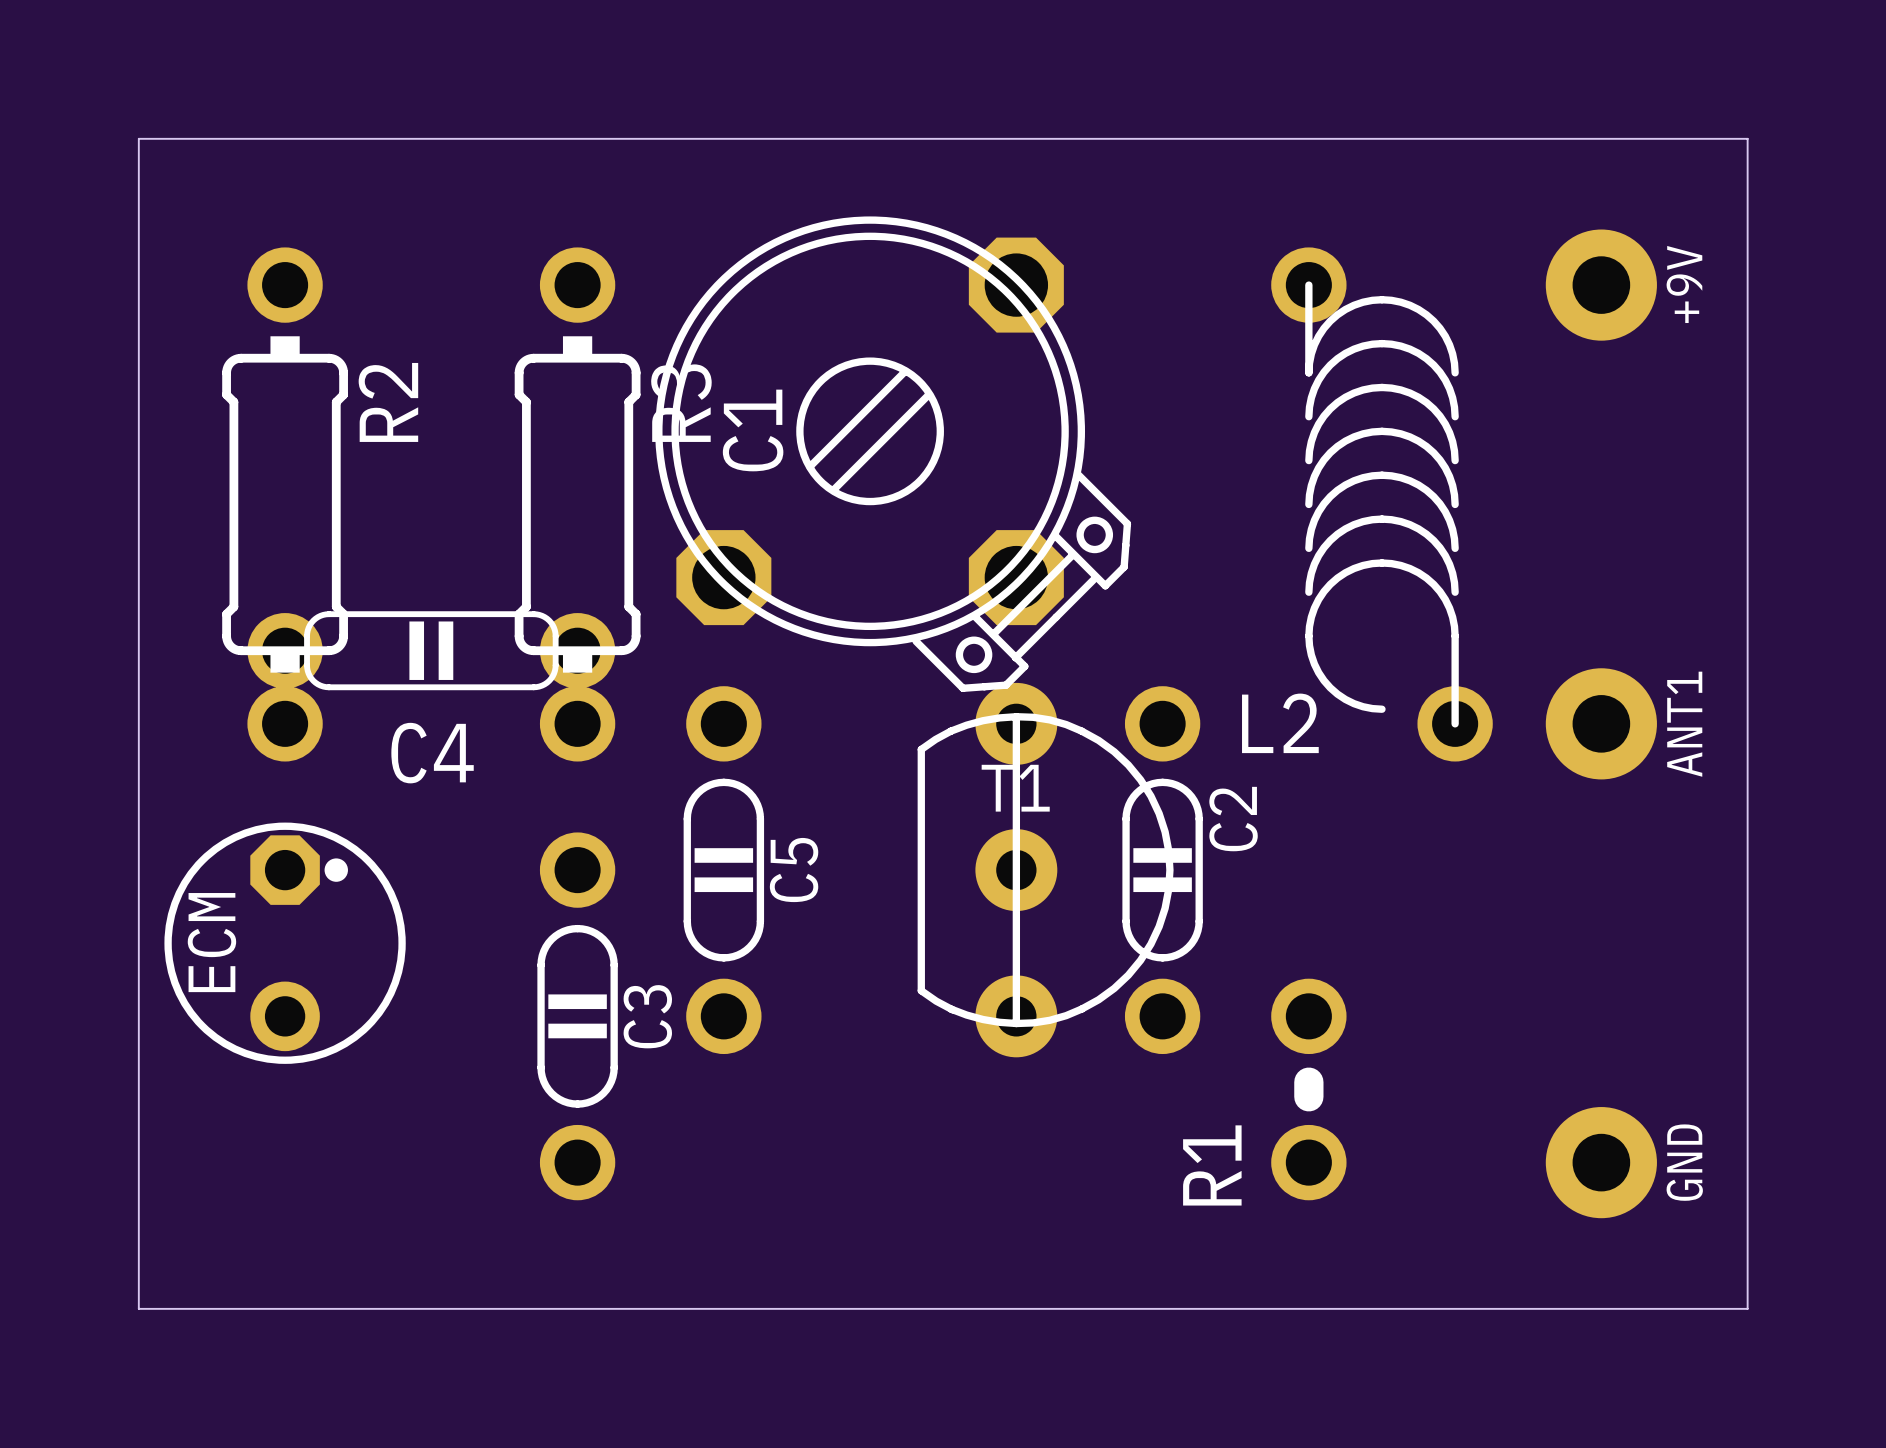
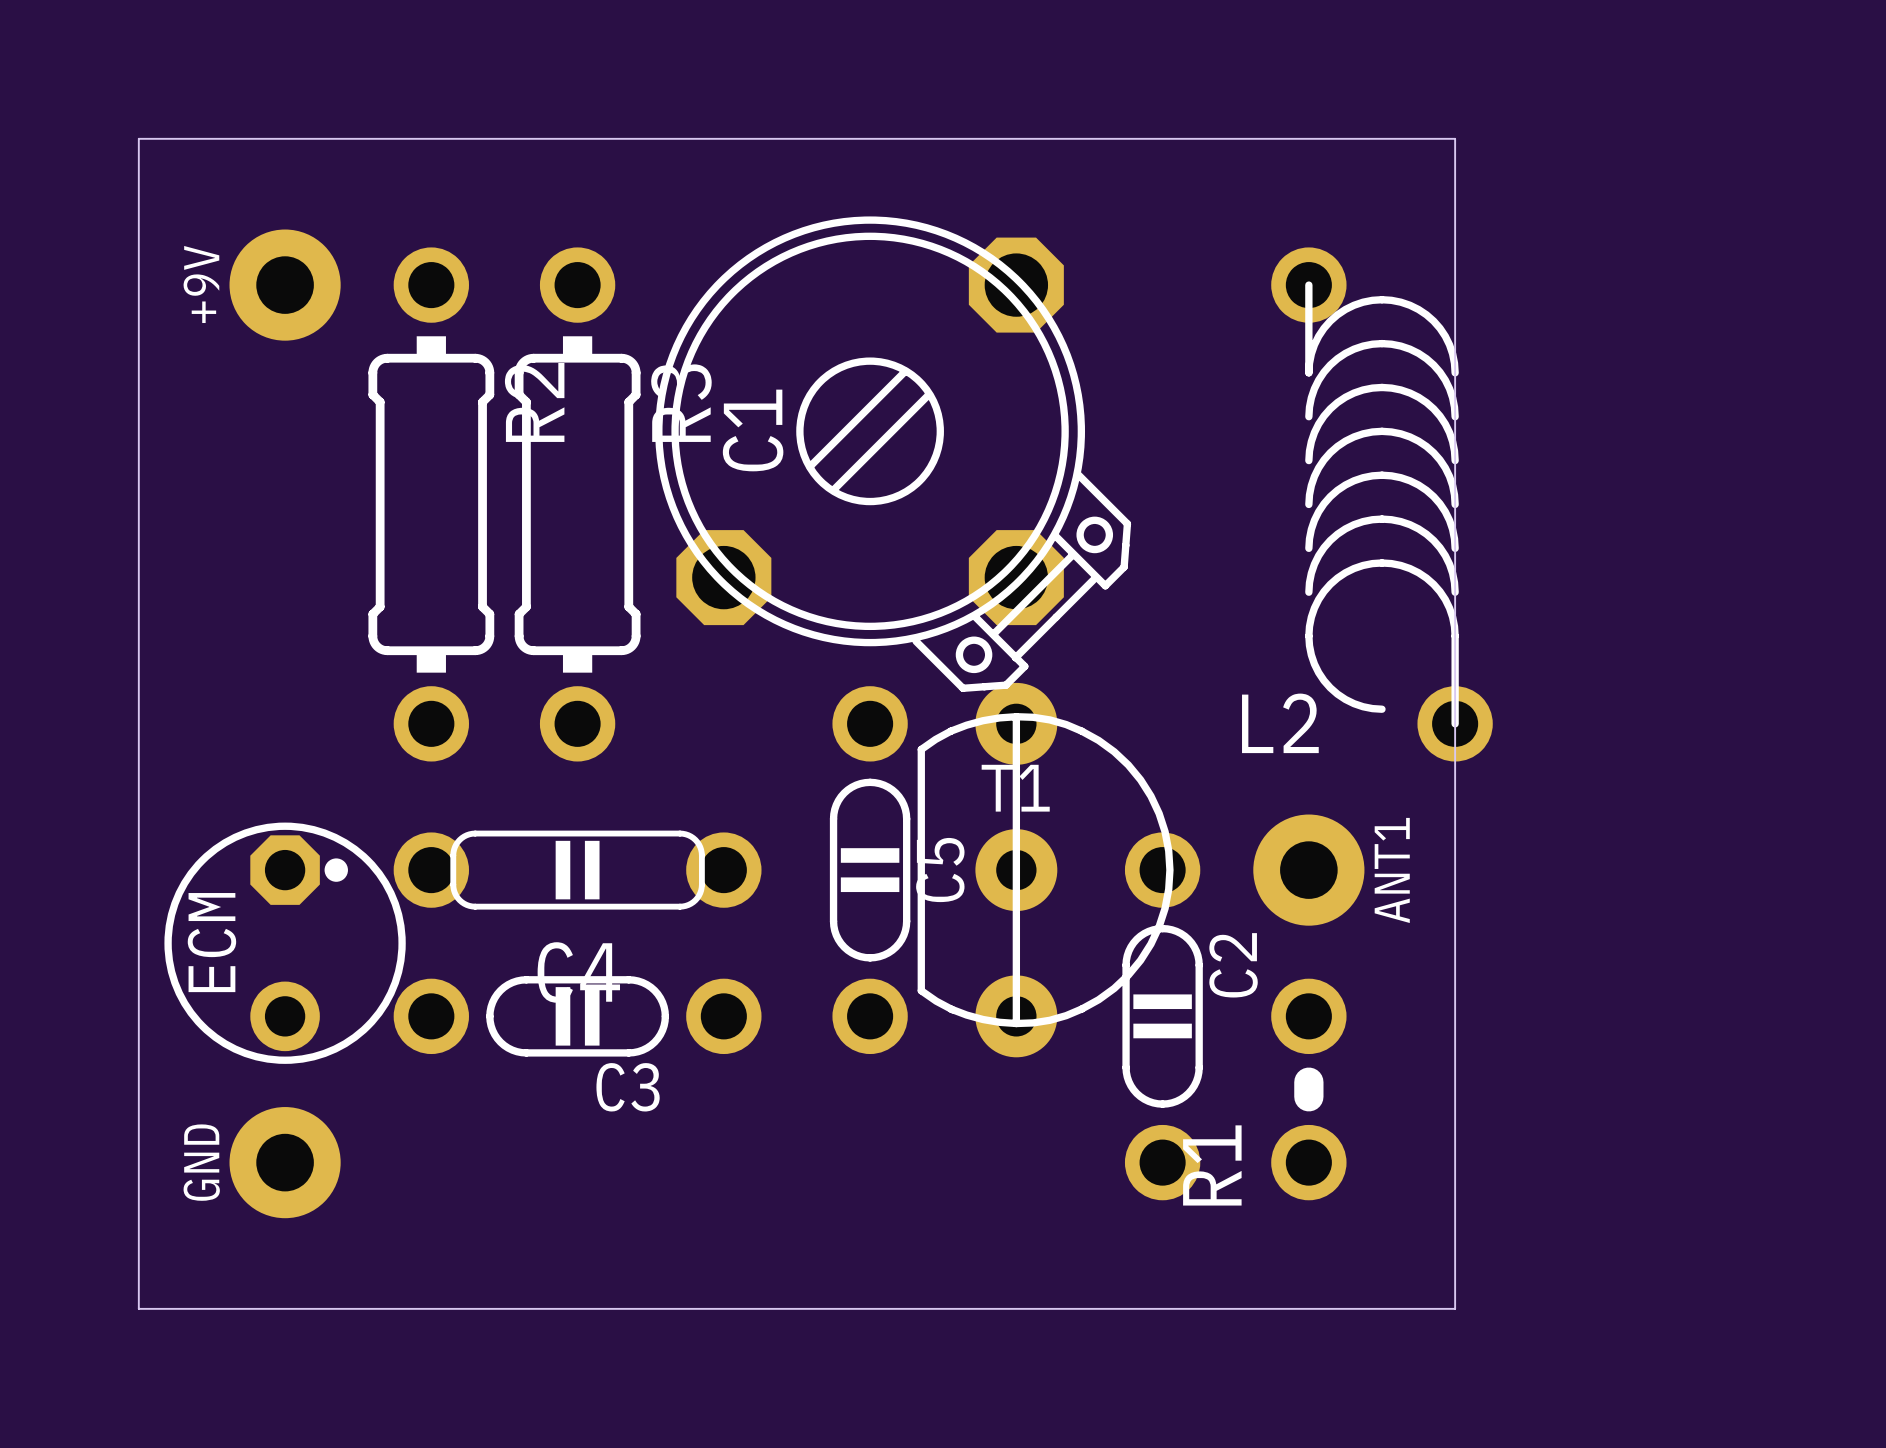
board edge: (1455, 138) (1747, 138) (1747, 1308) (1455, 1308) -> (1455, 138) (1455, 1308)
+9V name position: +9V (1684, 284) -> +9V (201, 284)
+9V position: (1601, 285) -> (285, 285)
R2 position: (285, 504) -> (431, 504)
C4 position: (431, 650) -> (577, 870)
ANT1 position: (1601, 723) -> (1308, 870)
C5 position: (723, 870) -> (870, 870)
C2 position: (1162, 870) -> (1162, 1016)
C3 rotation: 0° (577, 1016) -> 90° clockwise (577, 1016)
GND position: (1601, 1162) -> (285, 1162)
GND name position: GND (1684, 1162) -> GND (201, 1162)

